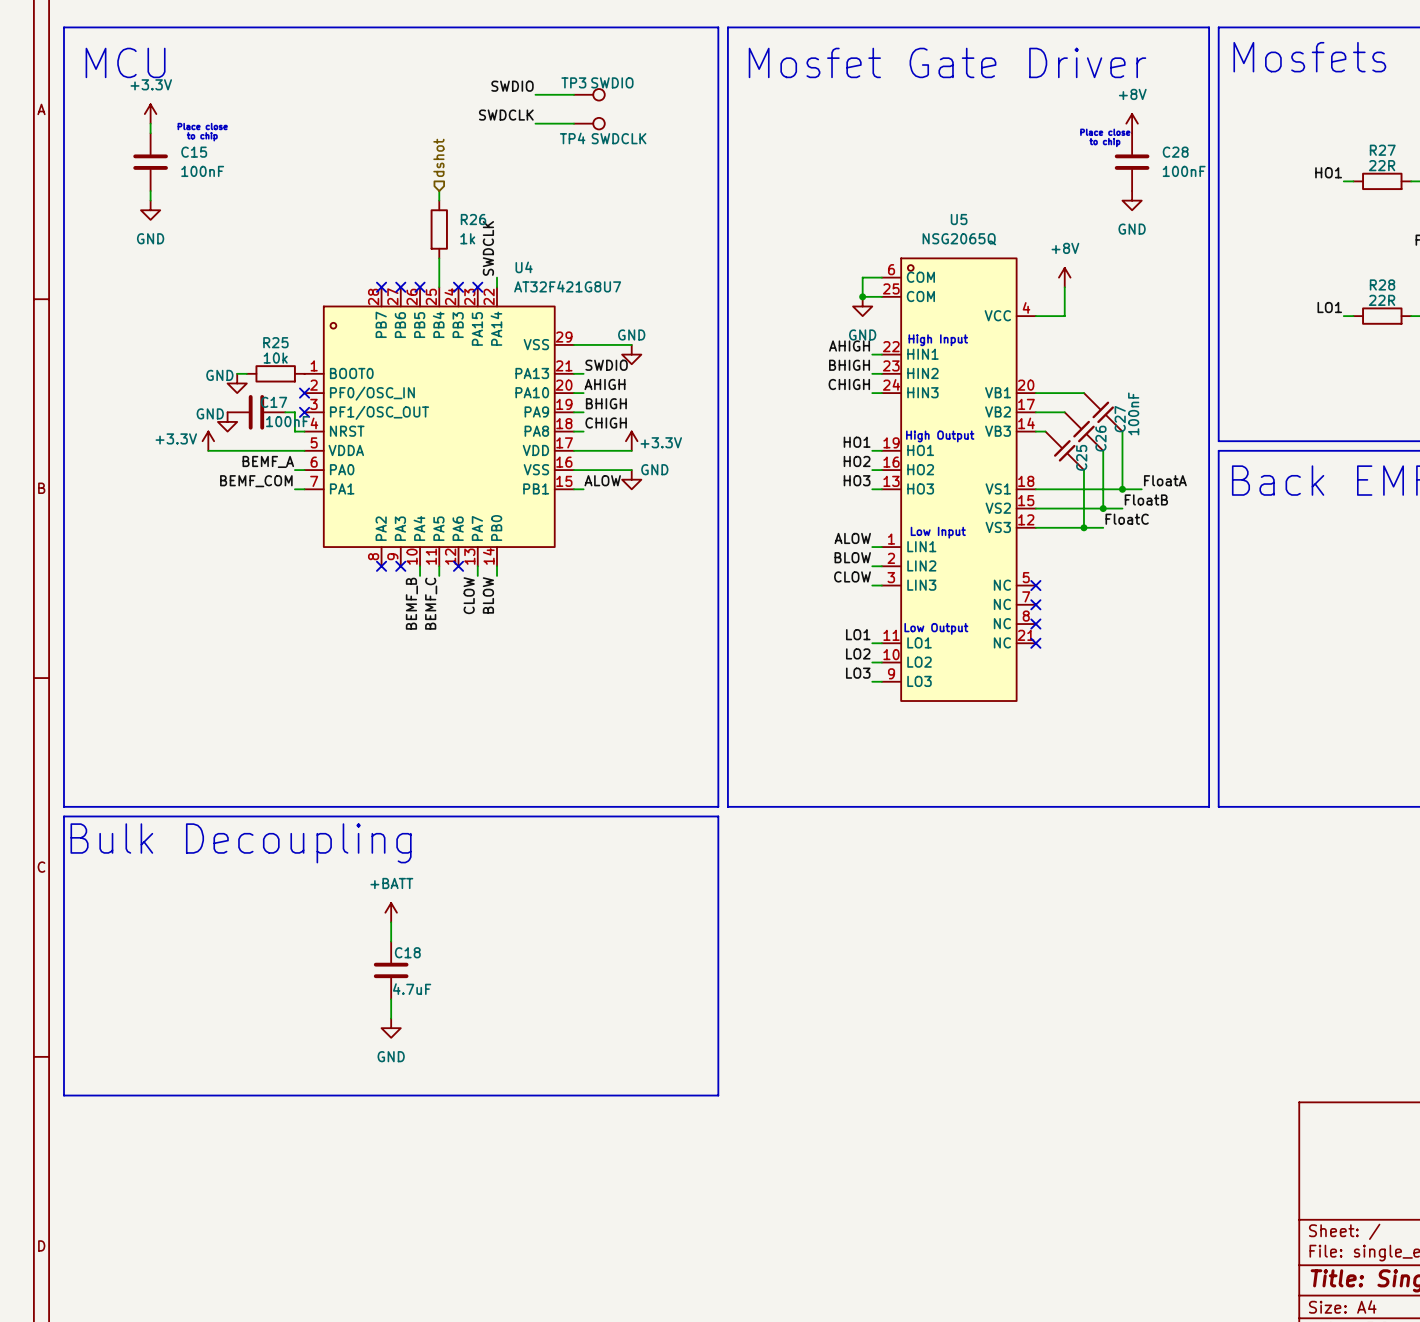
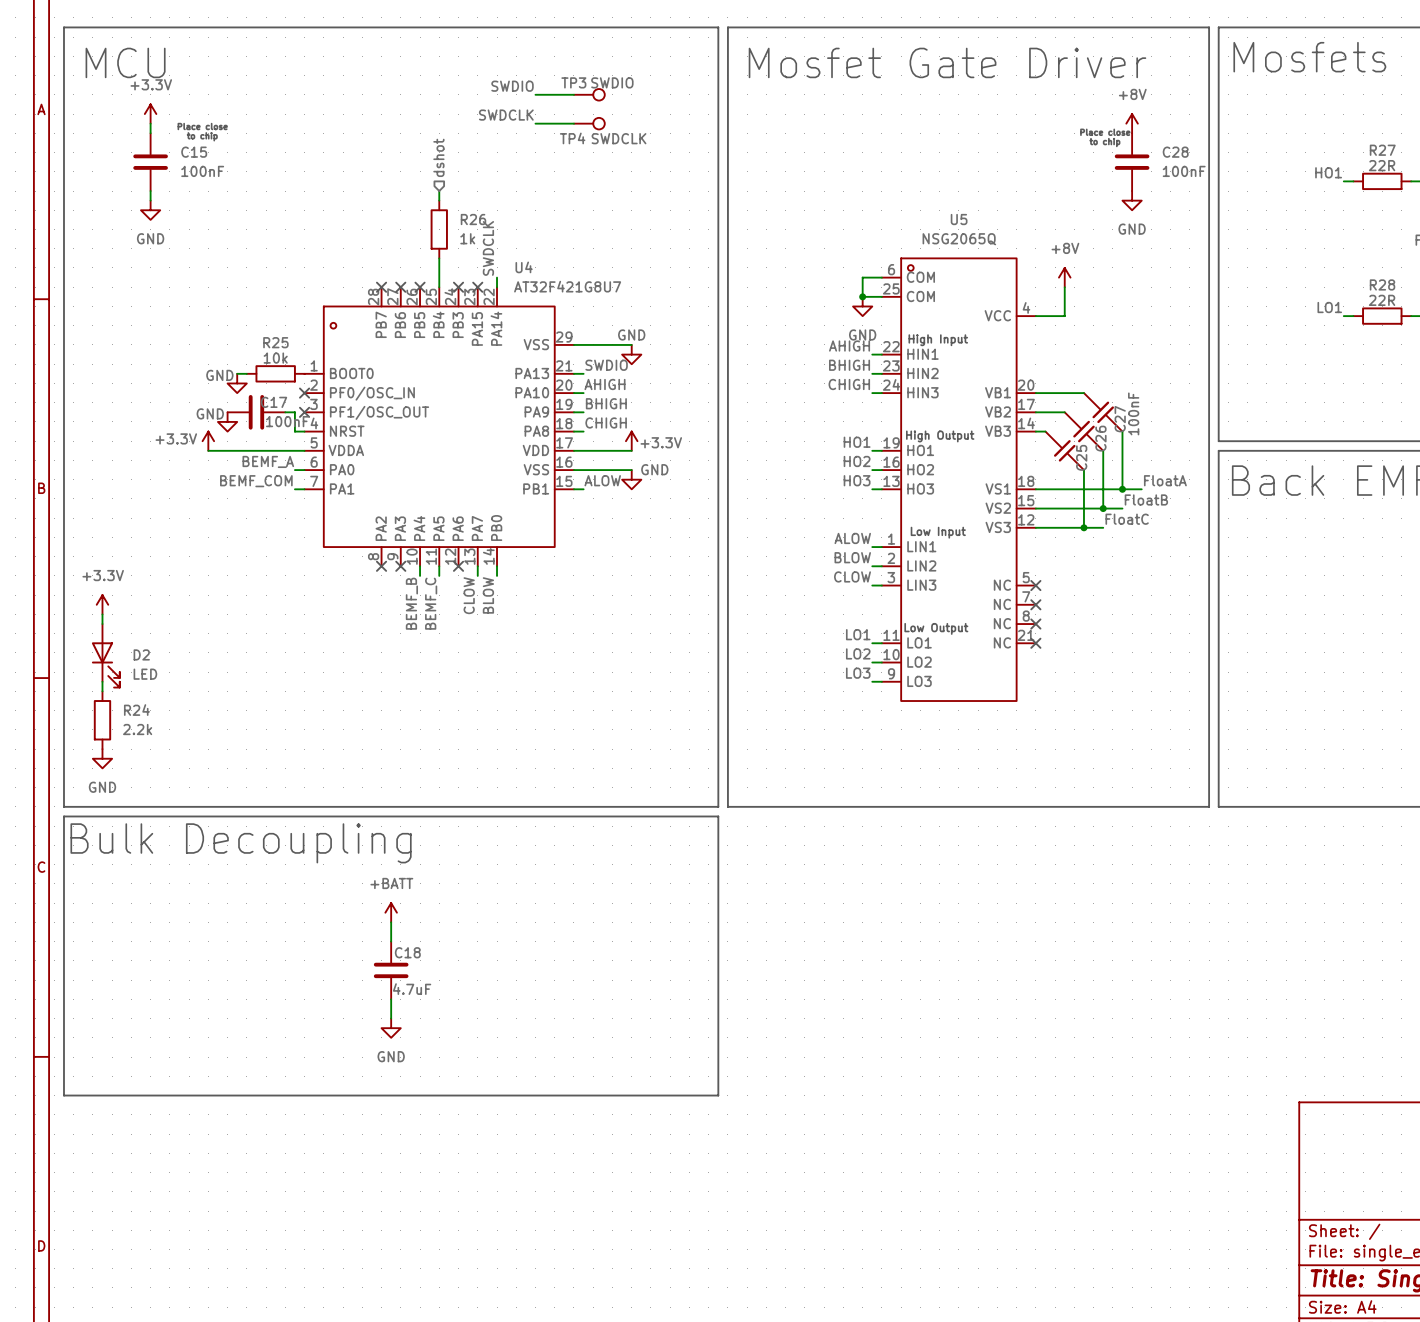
power symbol: none -> +3.3V (102, 604)
wire: none -> (102, 614) (102, 624)
D2: none -> LED (105, 655)
wire: none -> (102, 681) (102, 691)
R24: none -> 2.2k (102, 720)
power symbol: none -> GND (102, 758)

